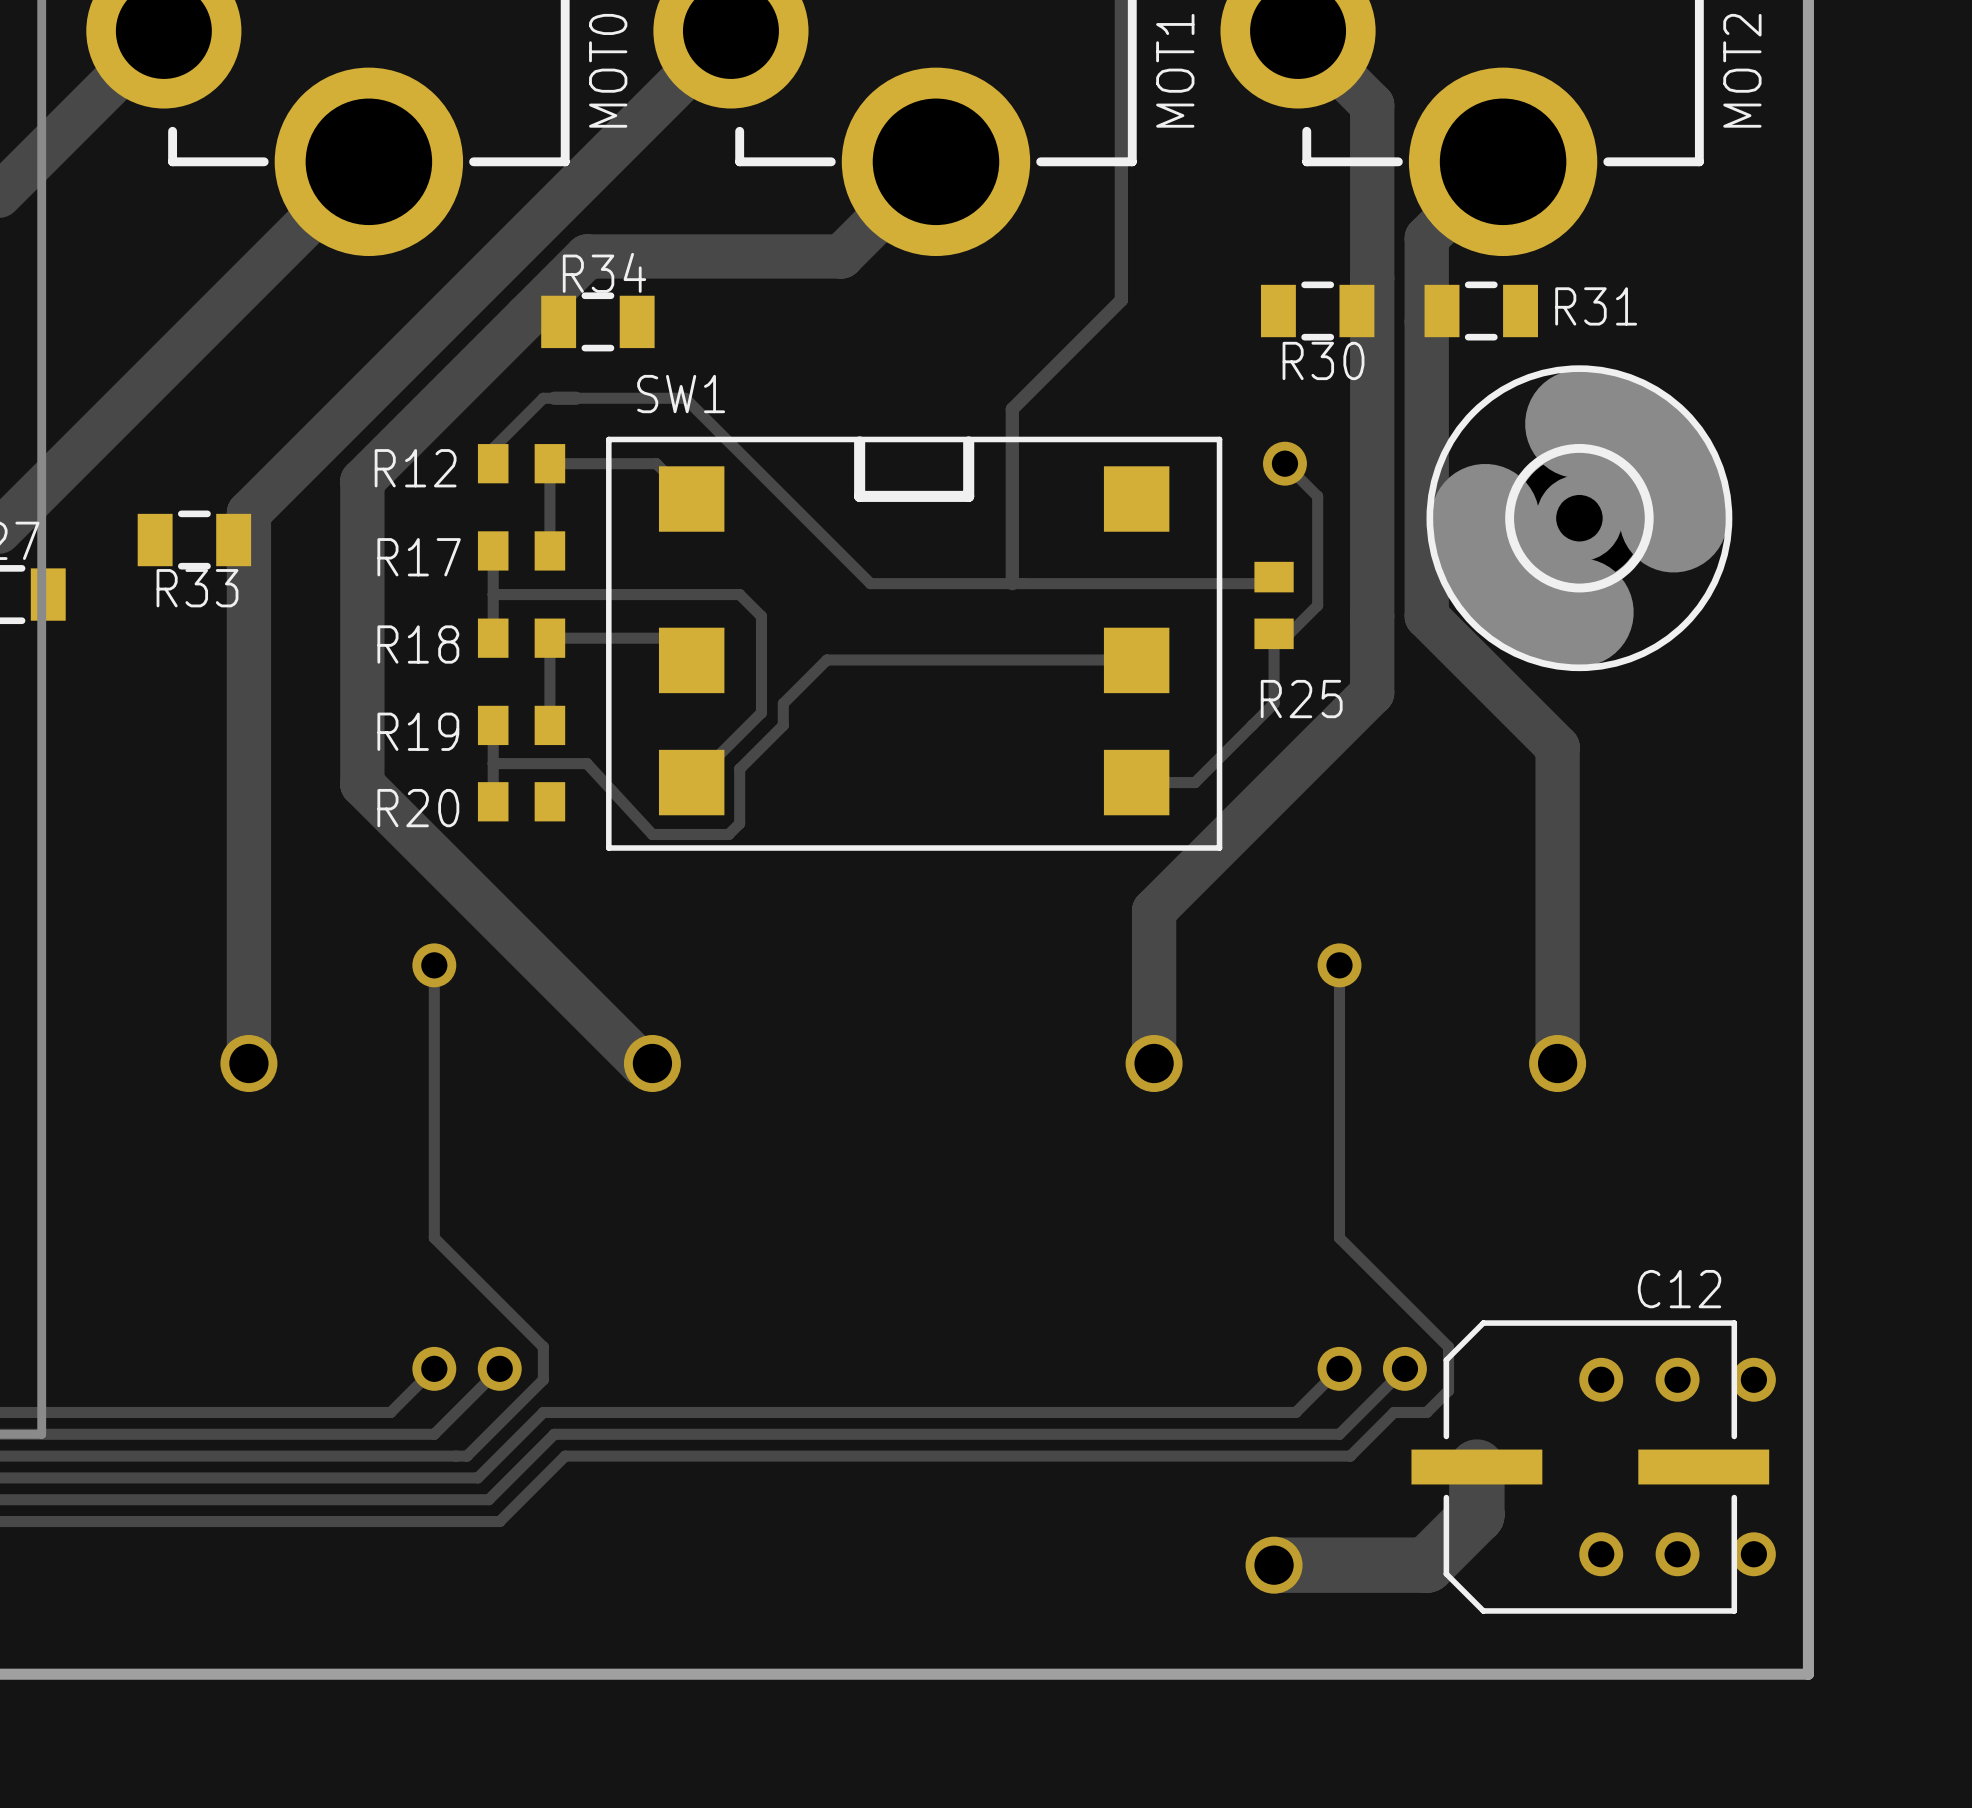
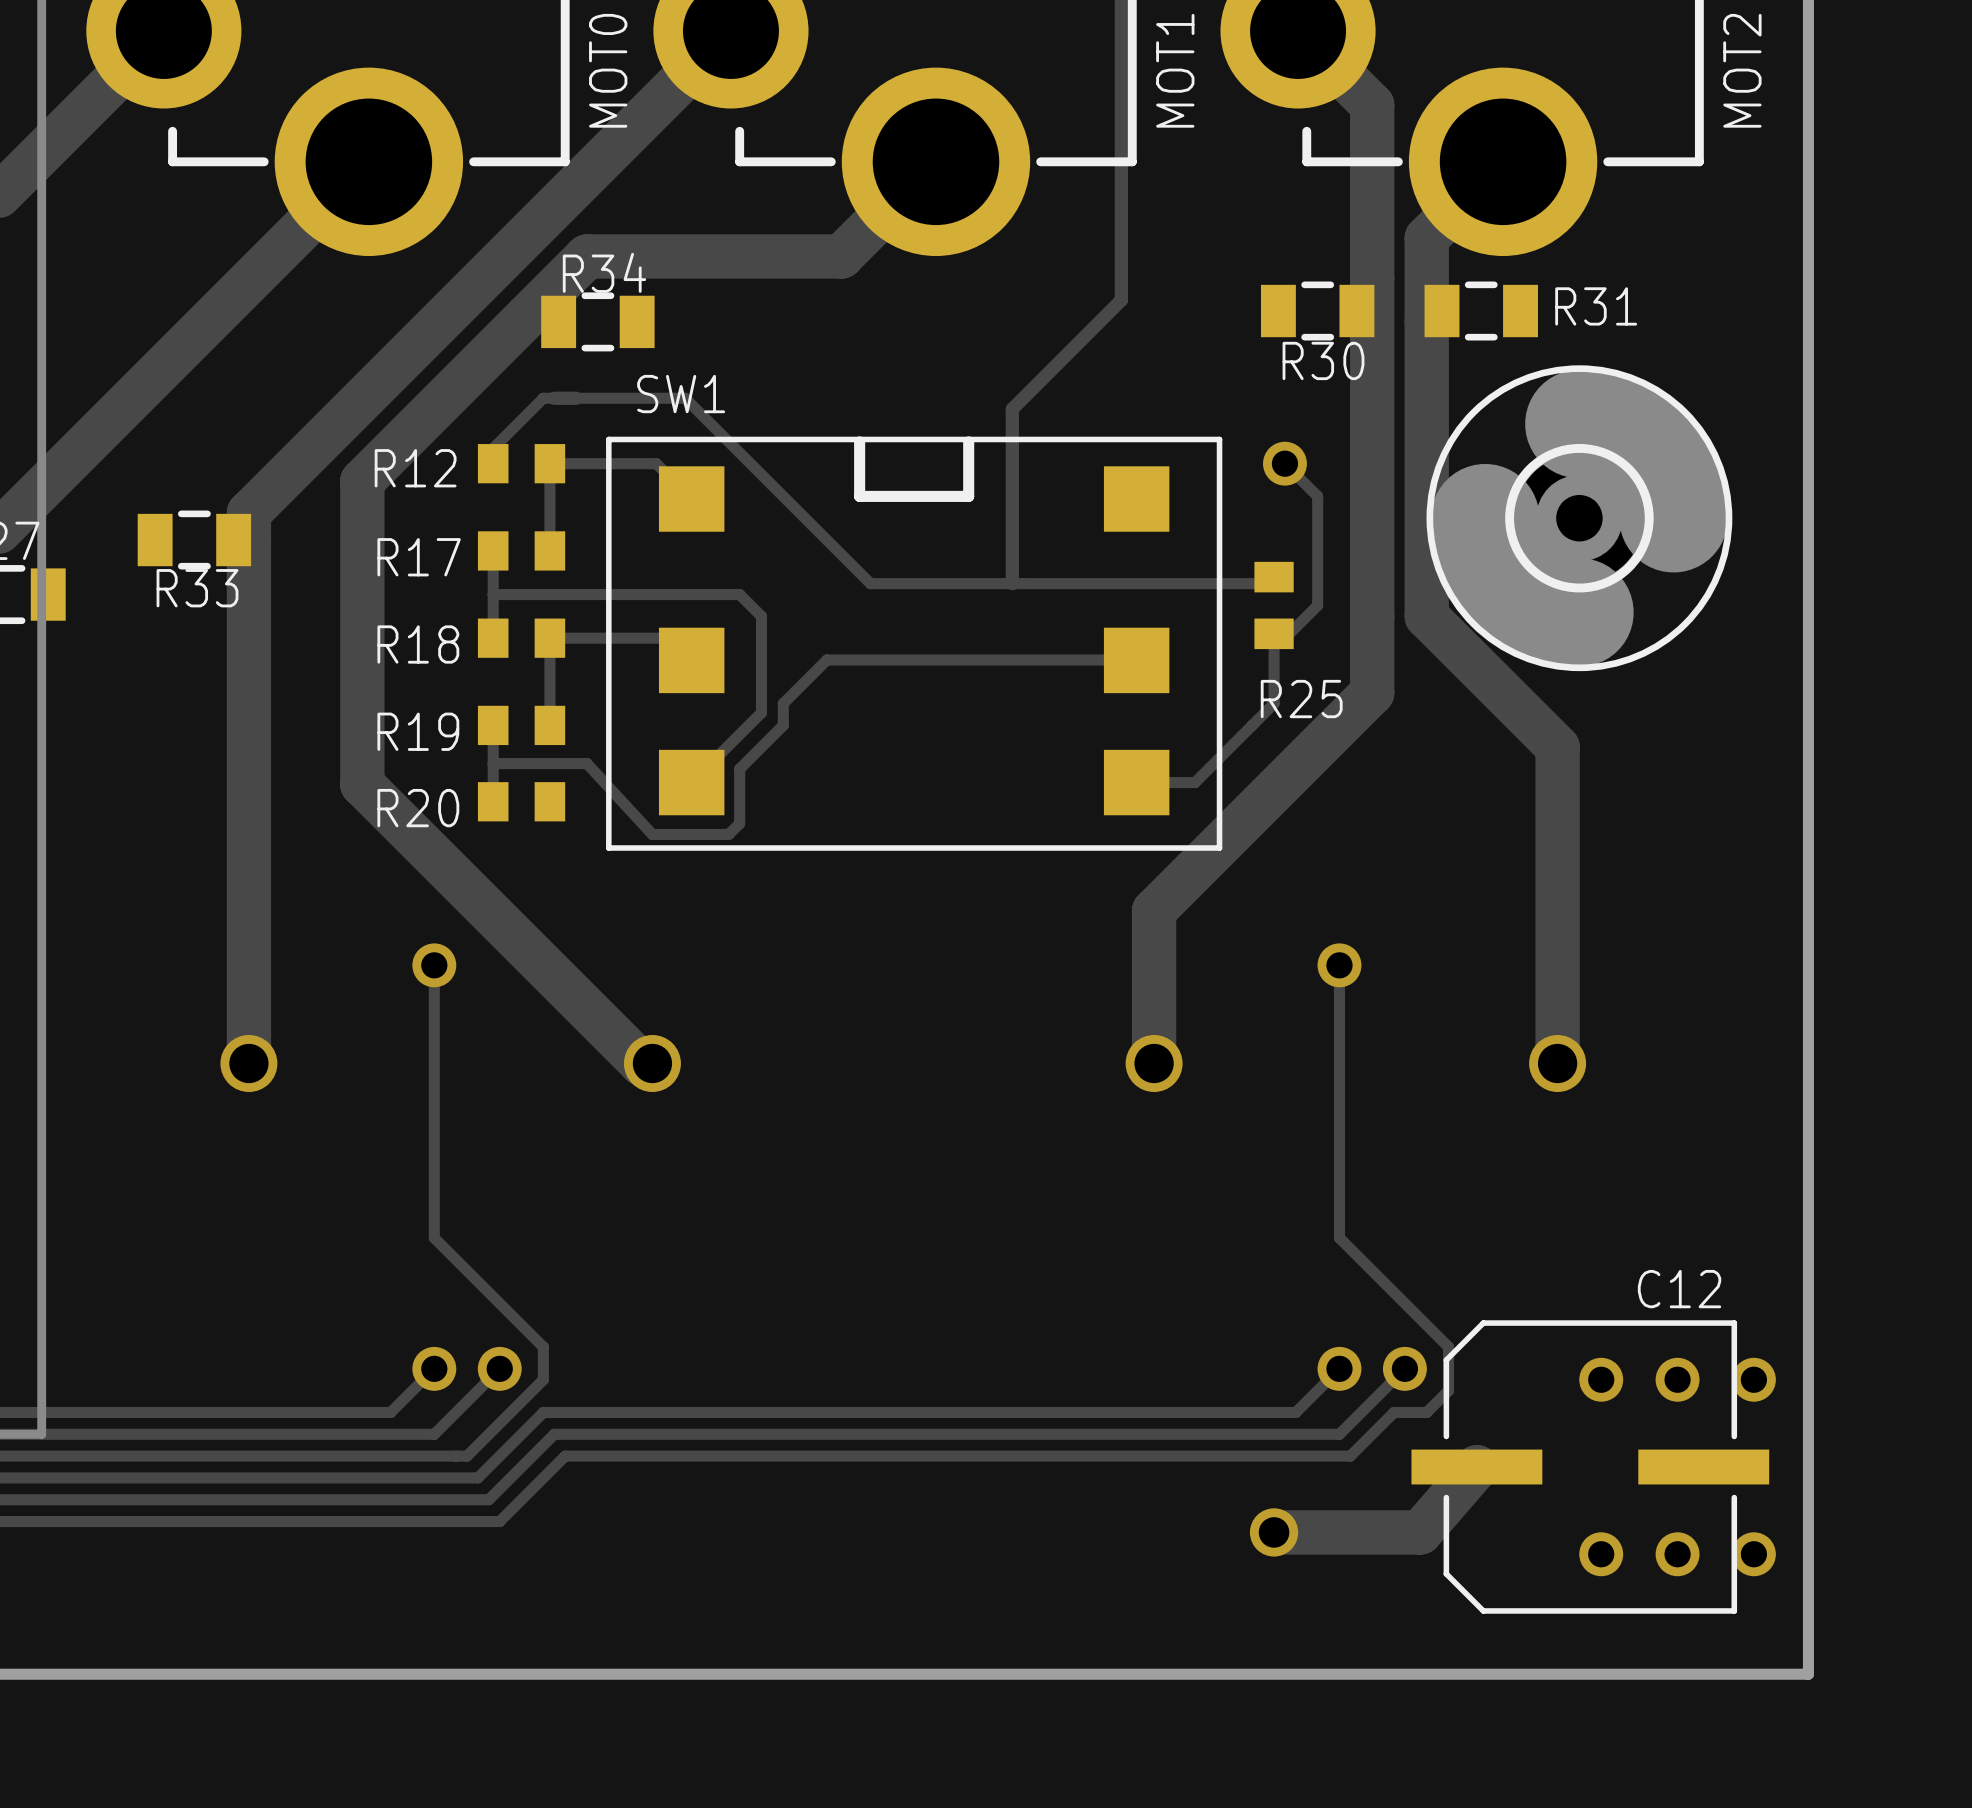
track: (1476, 1467) (1476, 1514) (1426, 1565) (1274, 1565) -> (1476, 1467) (1420, 1532) (1274, 1532)
via position: (1274, 1565) -> (1274, 1532)

